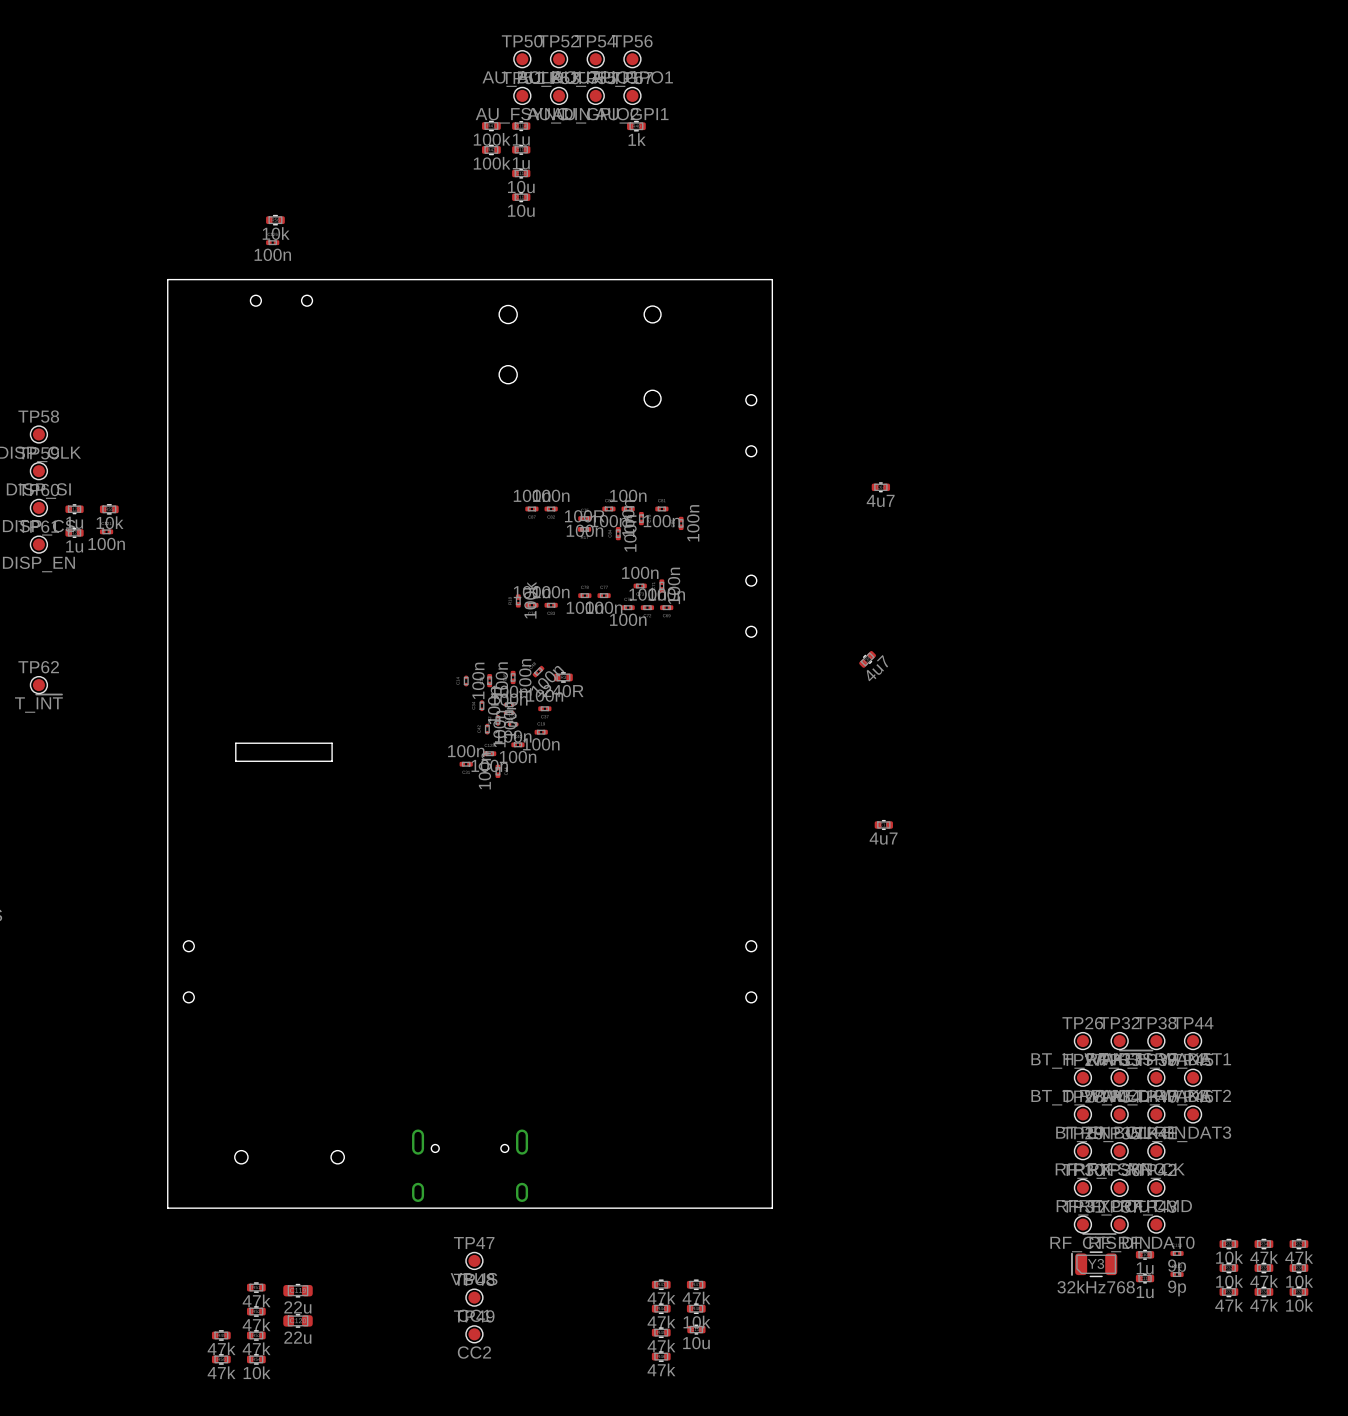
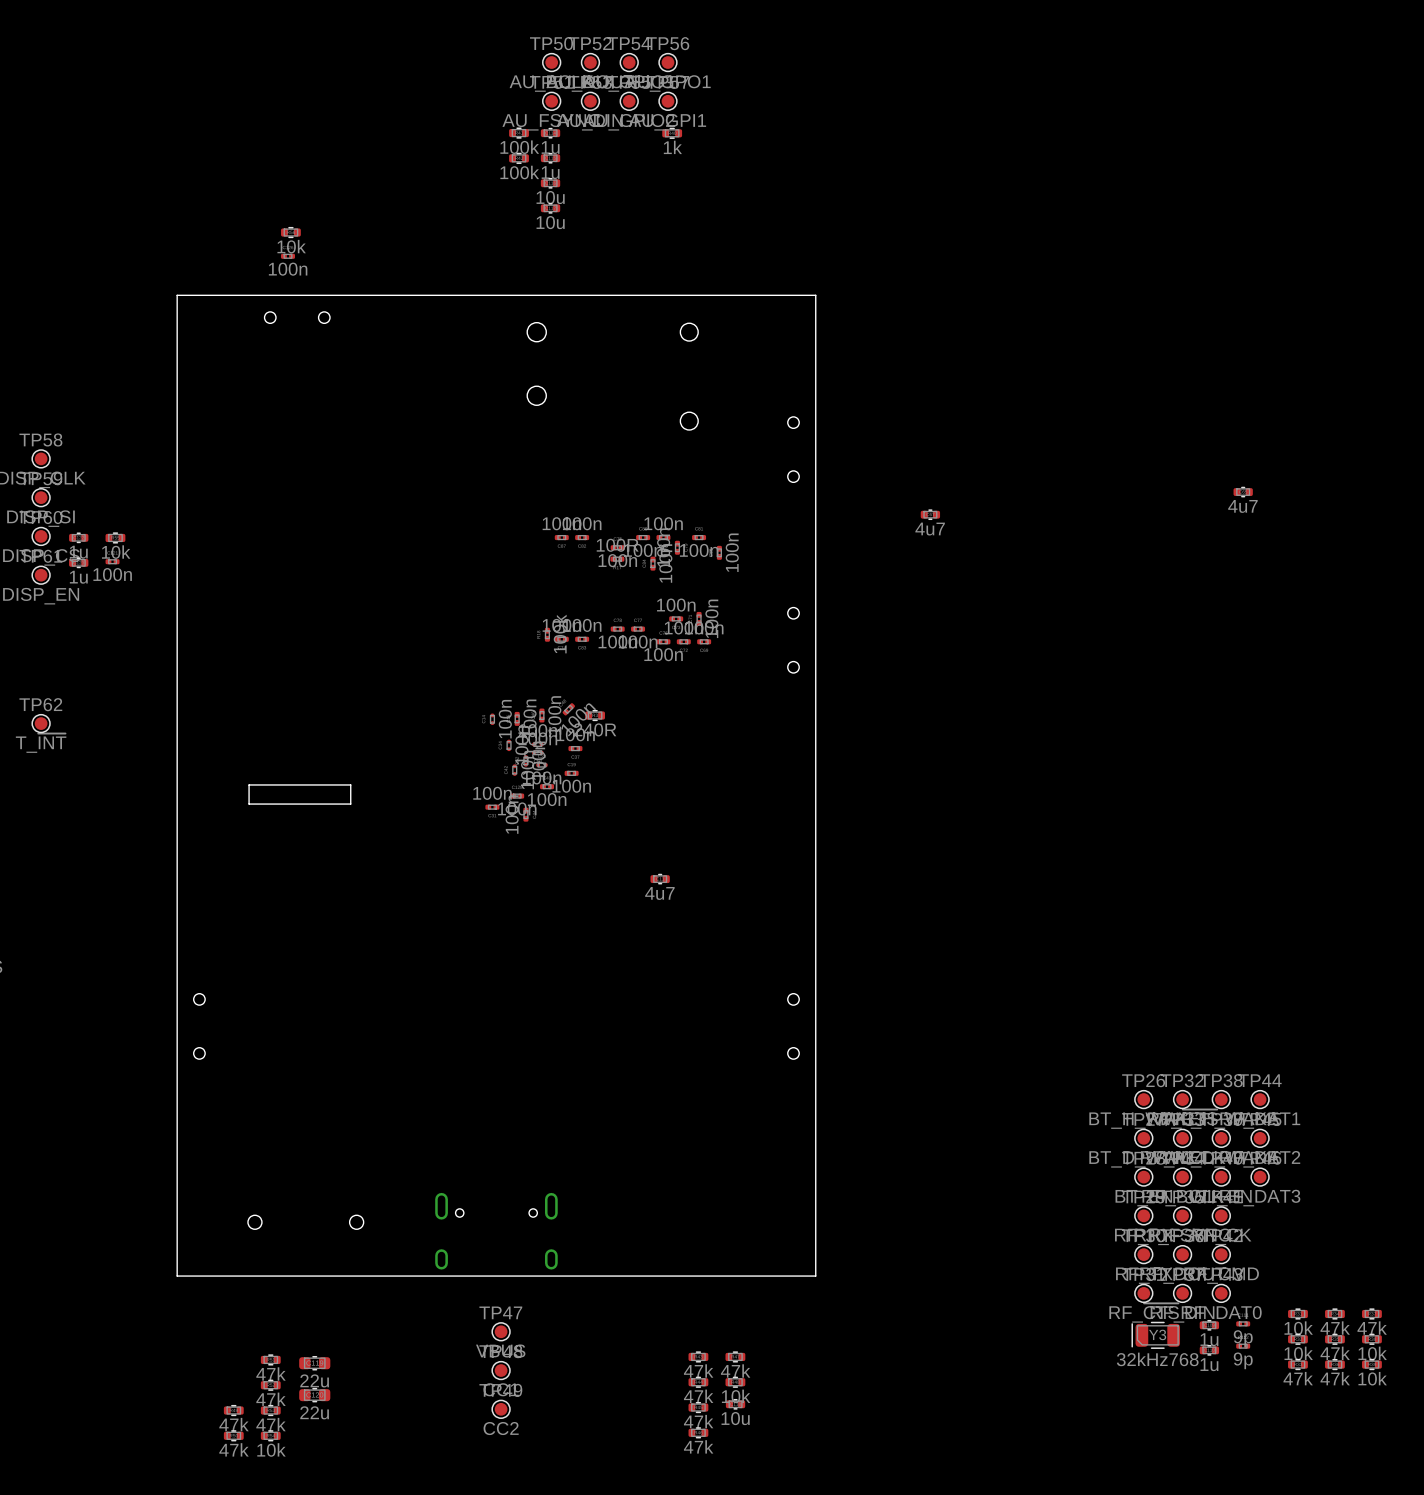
part rotation: 0° (867, 659) -> 45° clockwise (1243, 492)
part position: (867, 659) -> (1243, 492)
part position: (883, 824) -> (660, 879)

